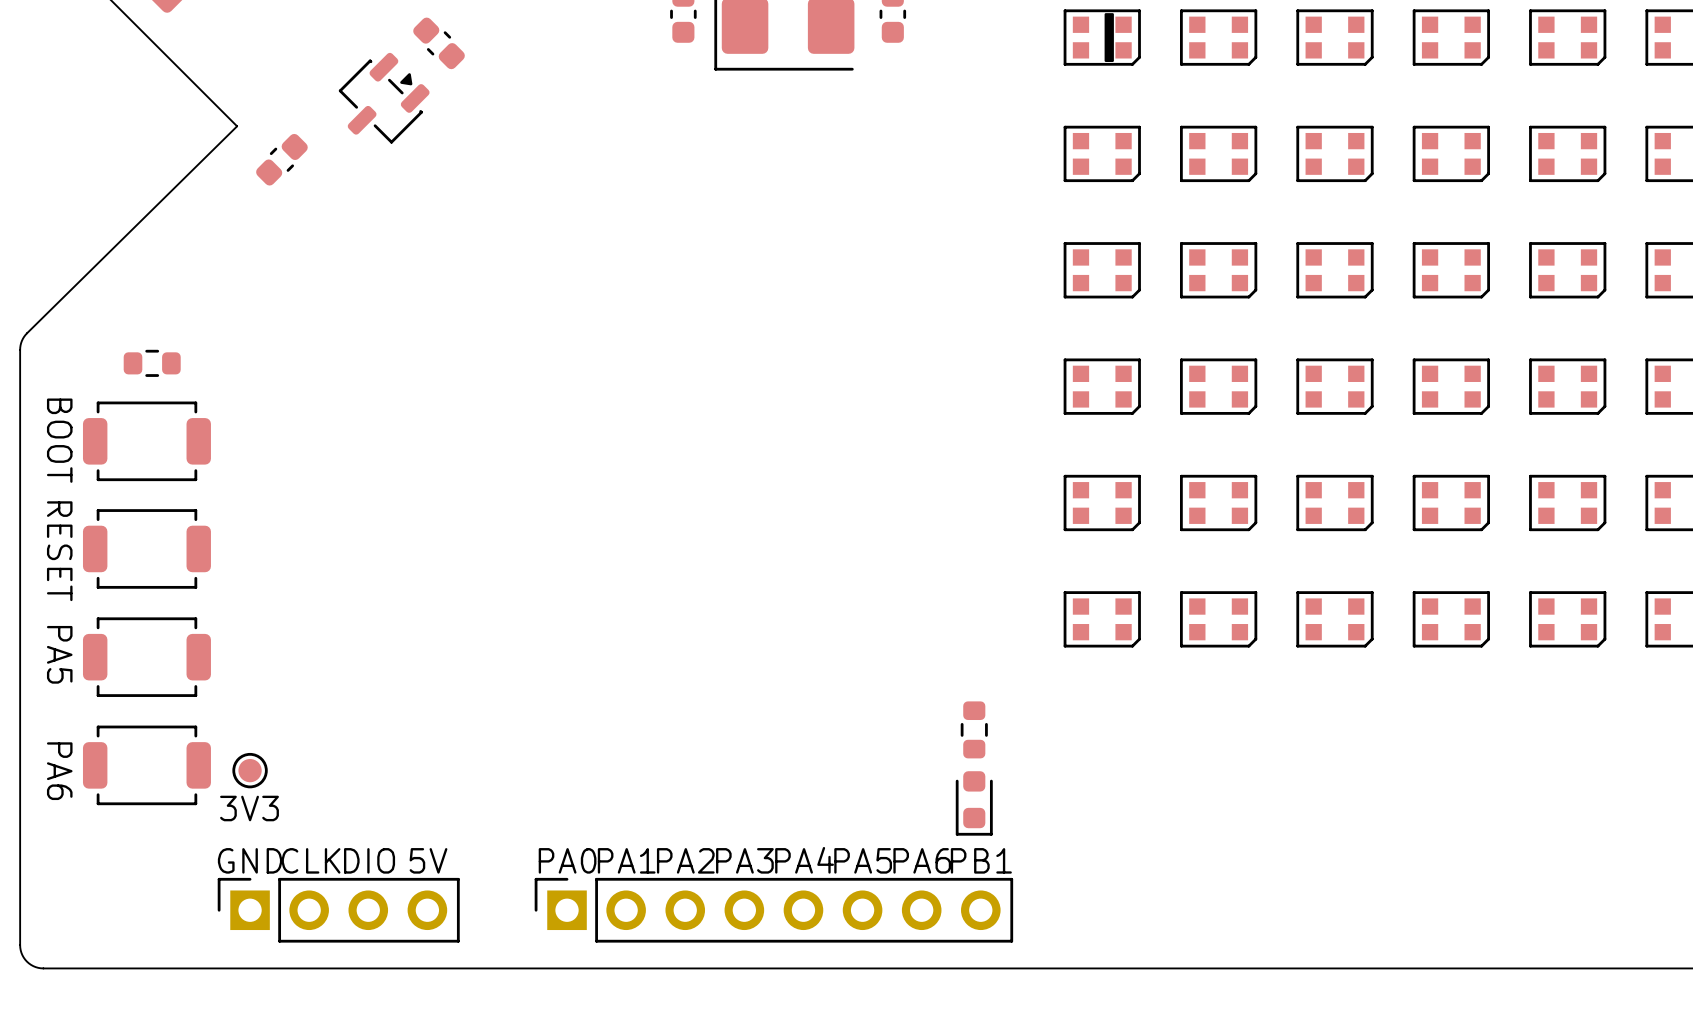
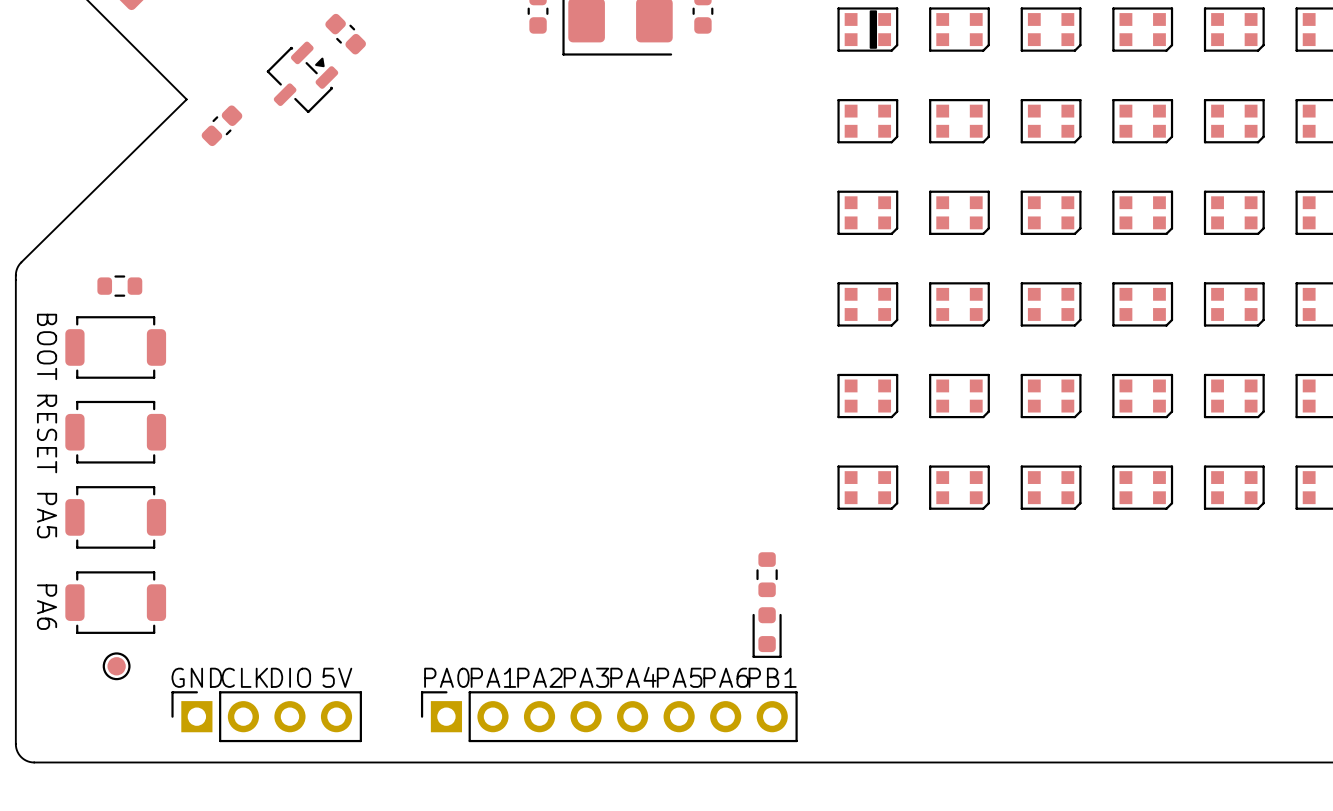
part position: (250, 770) -> (116, 666)
text: 3V3 (249, 808) -> none

